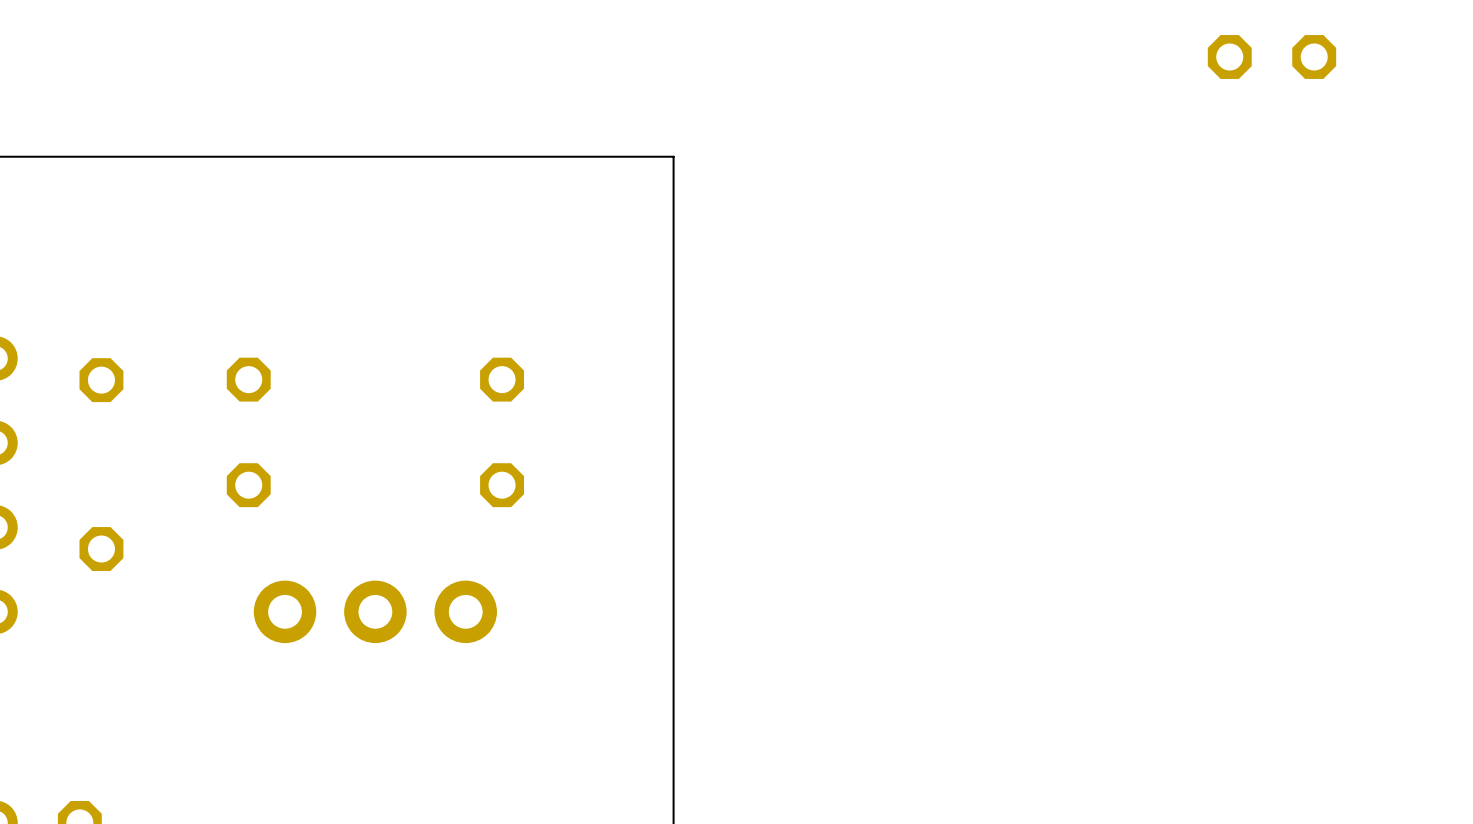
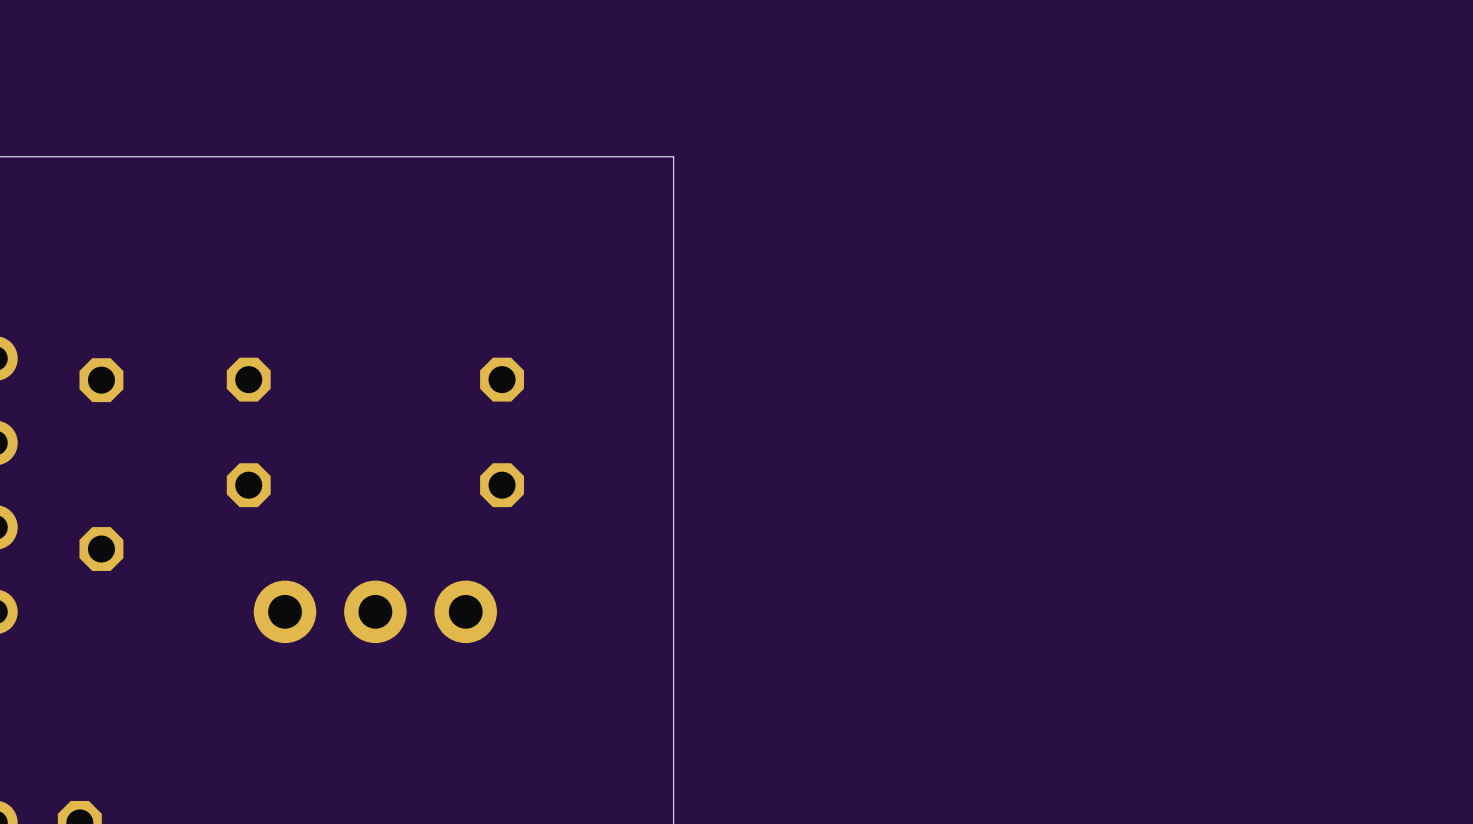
part: (1271, 57) -> none

